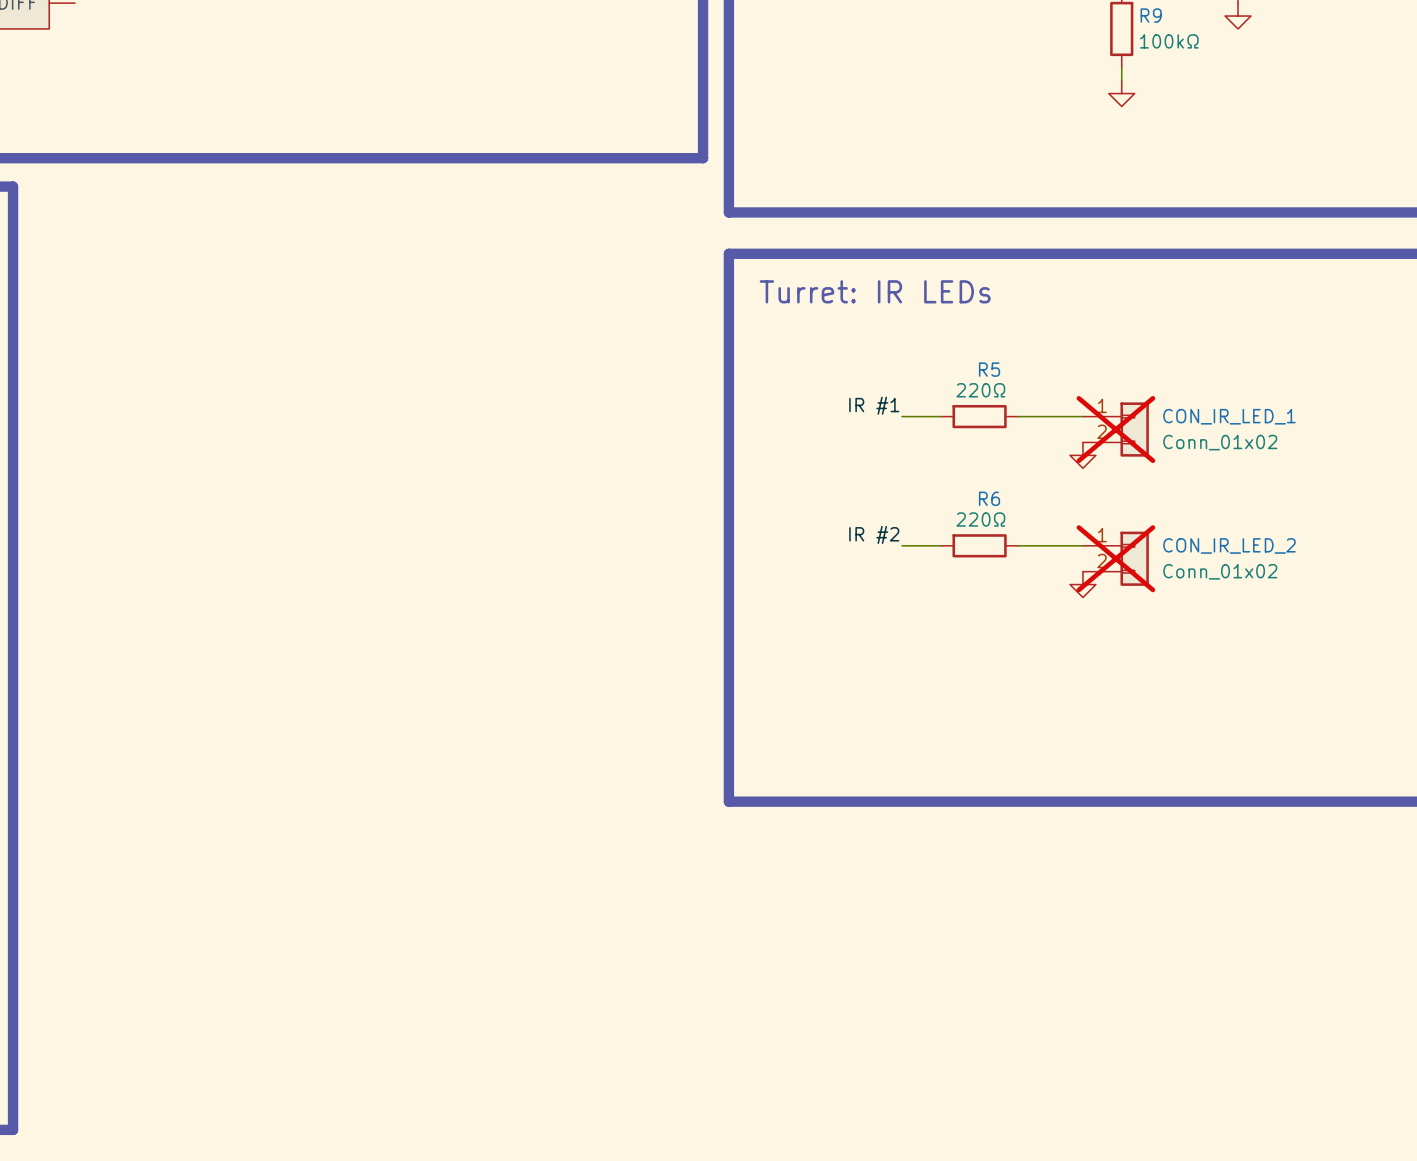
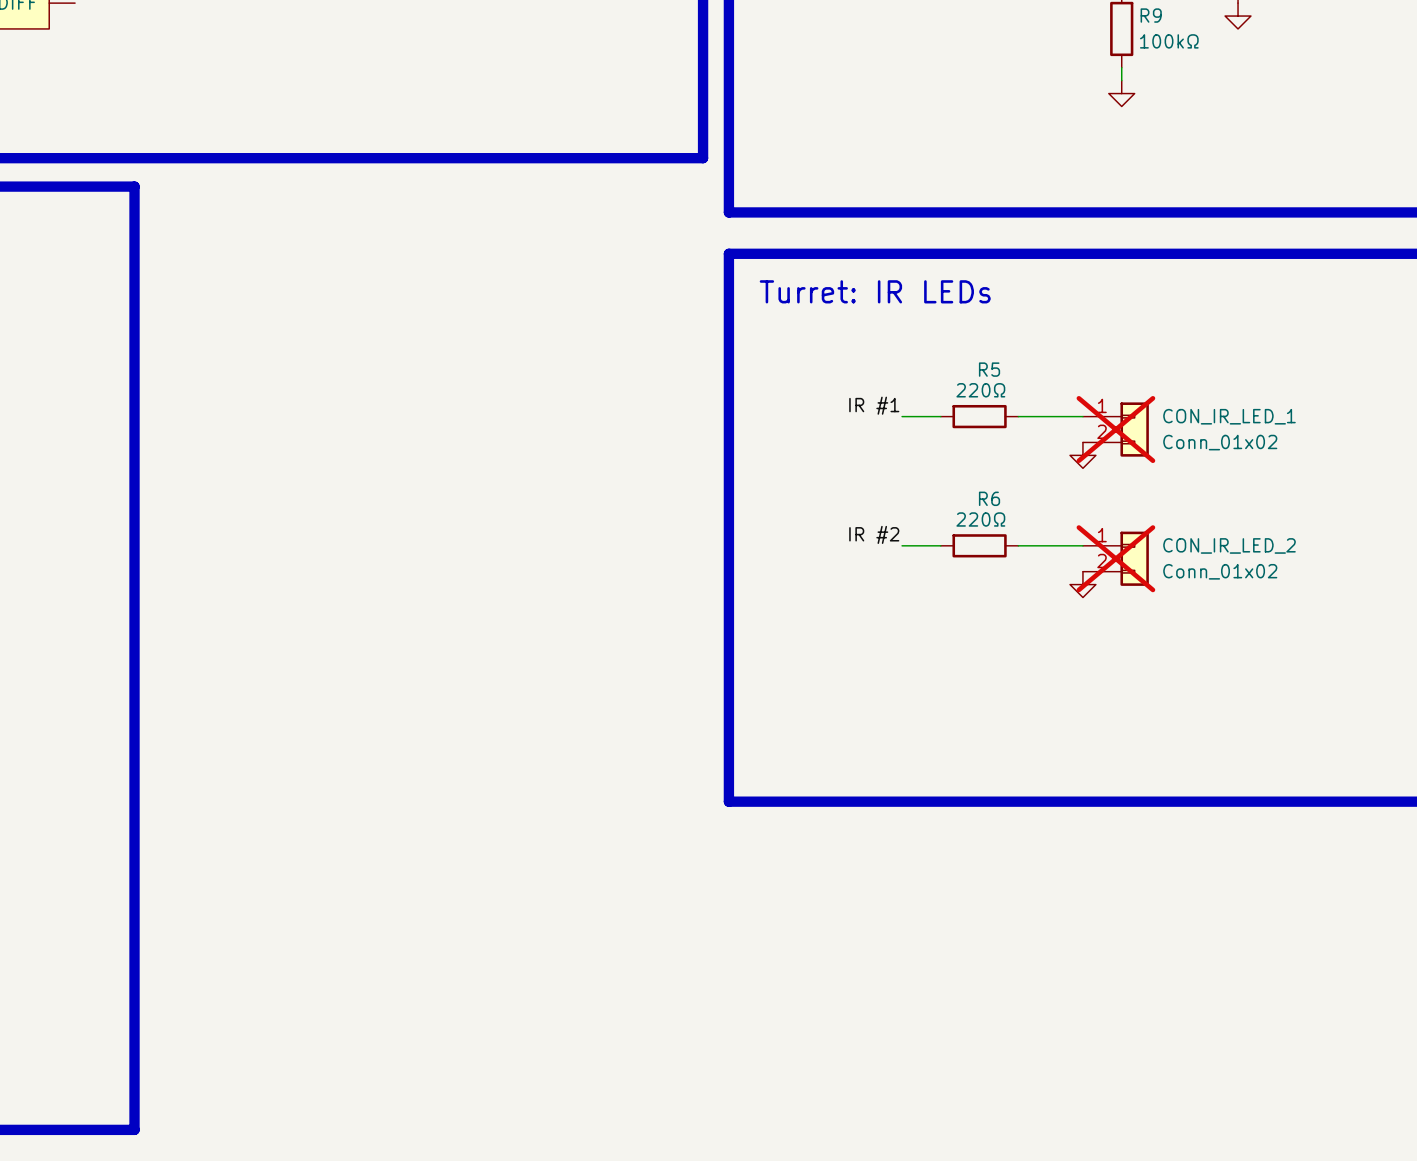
line: (13, 186) (13, 1129) -> (13, 186) (134, 186) (134, 1129) (13, 1129)

